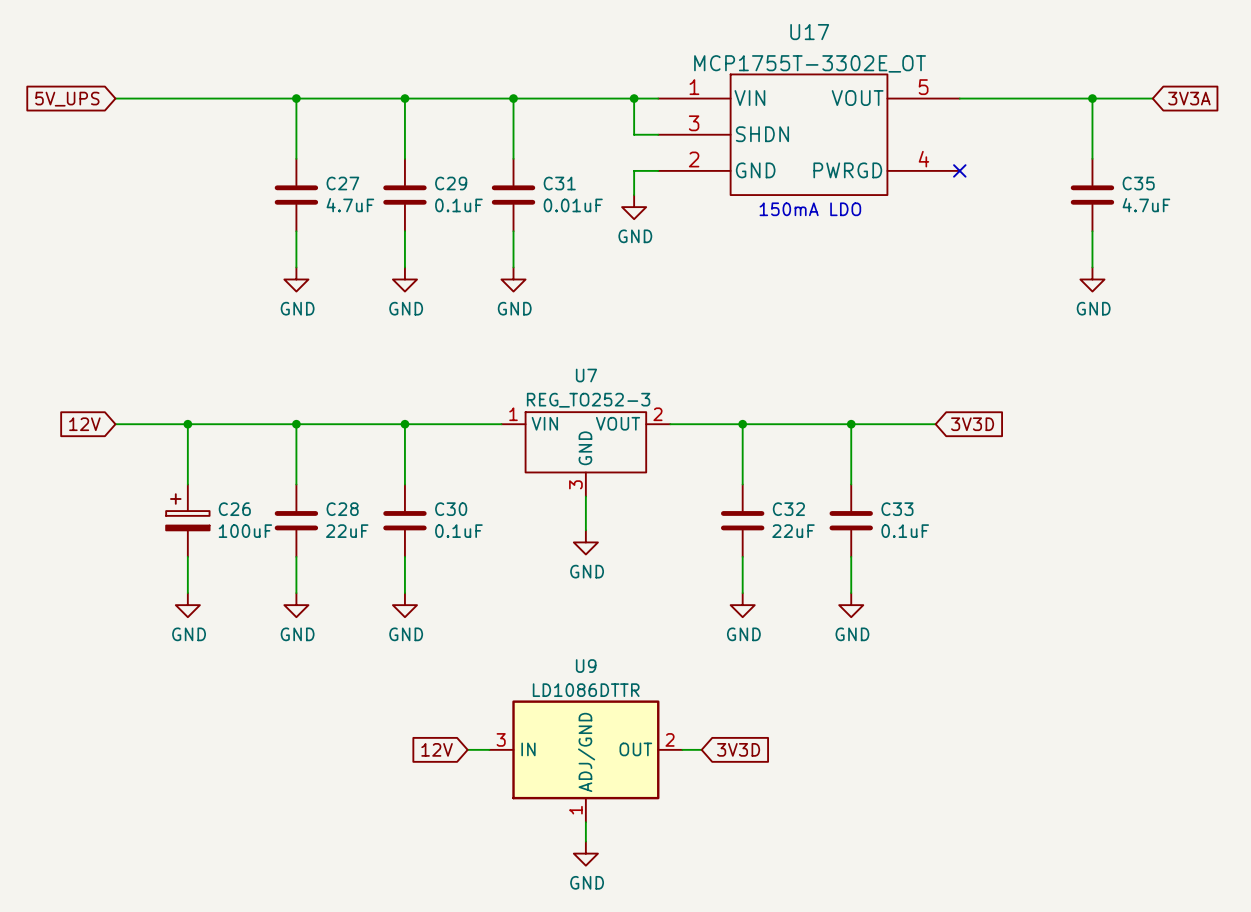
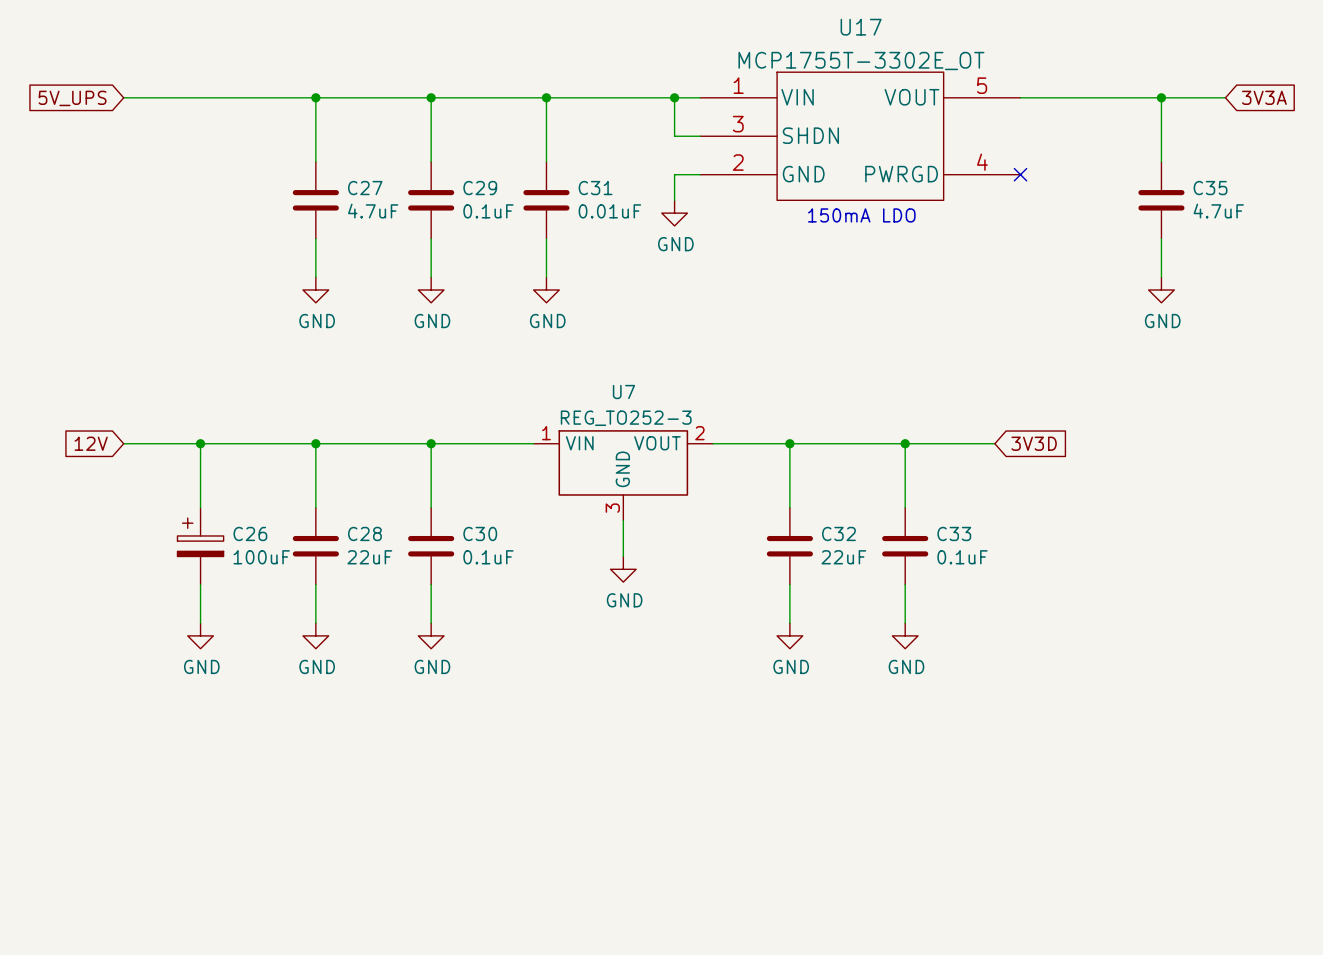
global label: 12V (437, 749) -> none
wire: (467, 749) (489, 749) -> none
wire: (682, 749) (701, 749) -> none
global label: 3V3D (738, 749) -> none
U9: LD1086DTTR (585, 761) -> none
wire: (585, 822) (585, 841) -> none
power symbol: GND (585, 853) -> none

